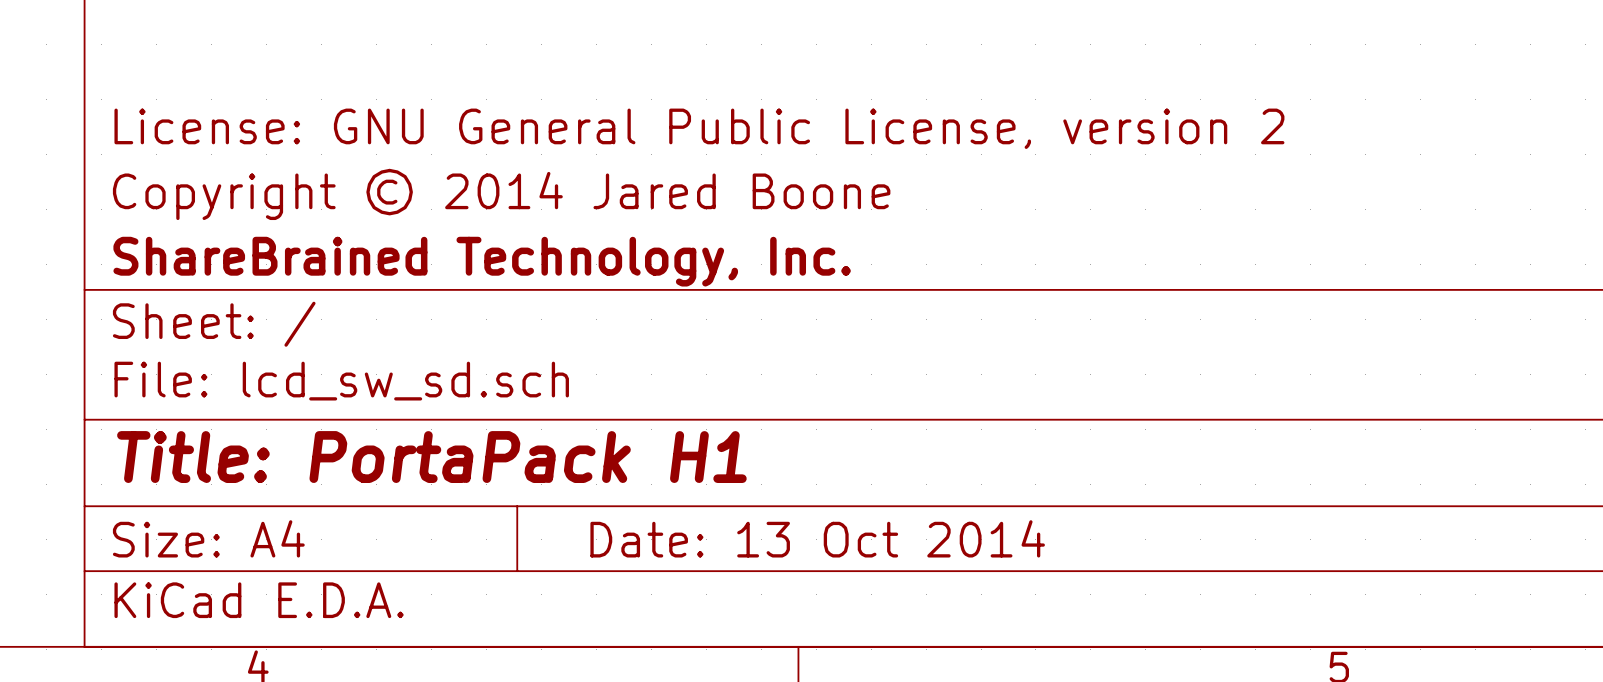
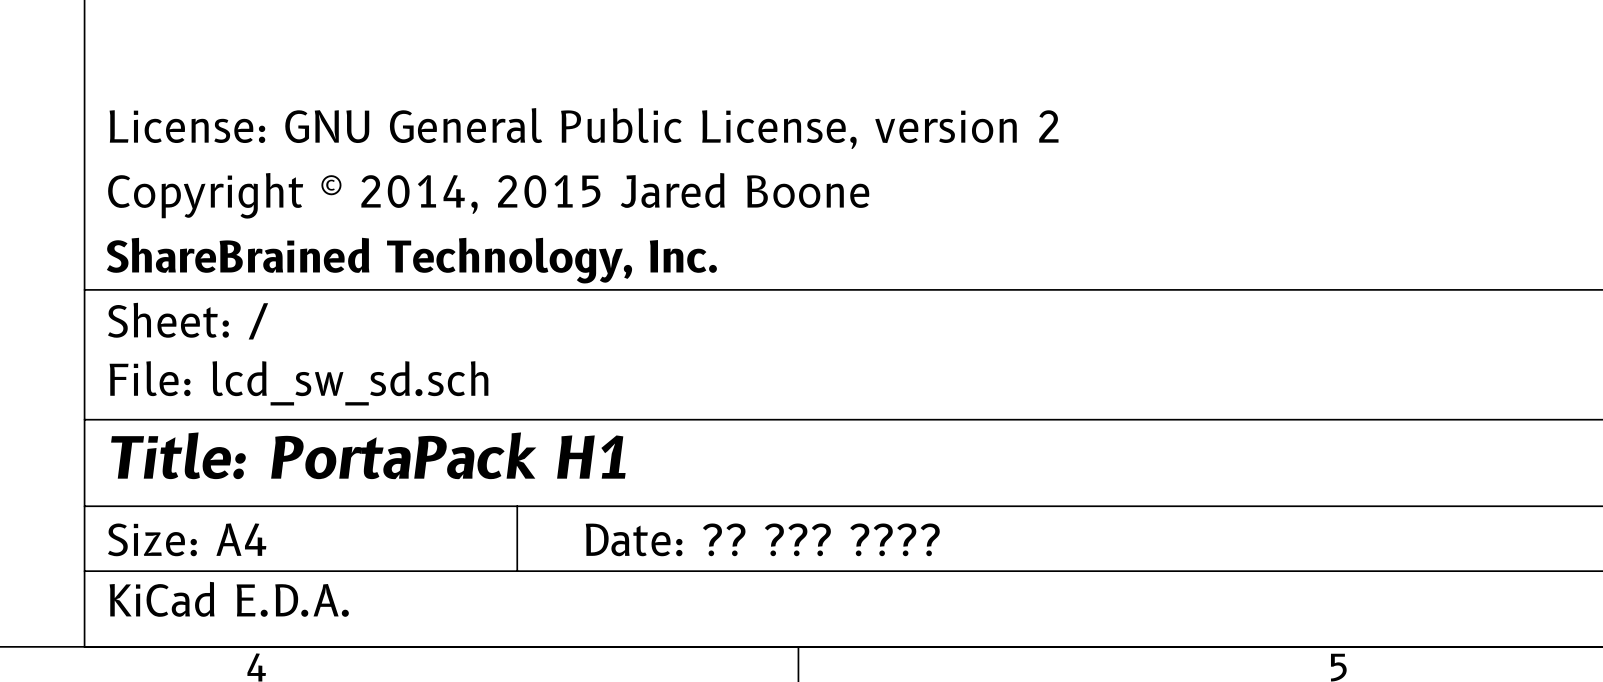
title block: Copyright © 2014 Jared Boone (501, 194) -> Copyright © 2014, 2015 Jared Boone (488, 195)
title block: Date: 13 Oct 2014 (817, 538) -> Date: ?? ??? ???? (762, 539)

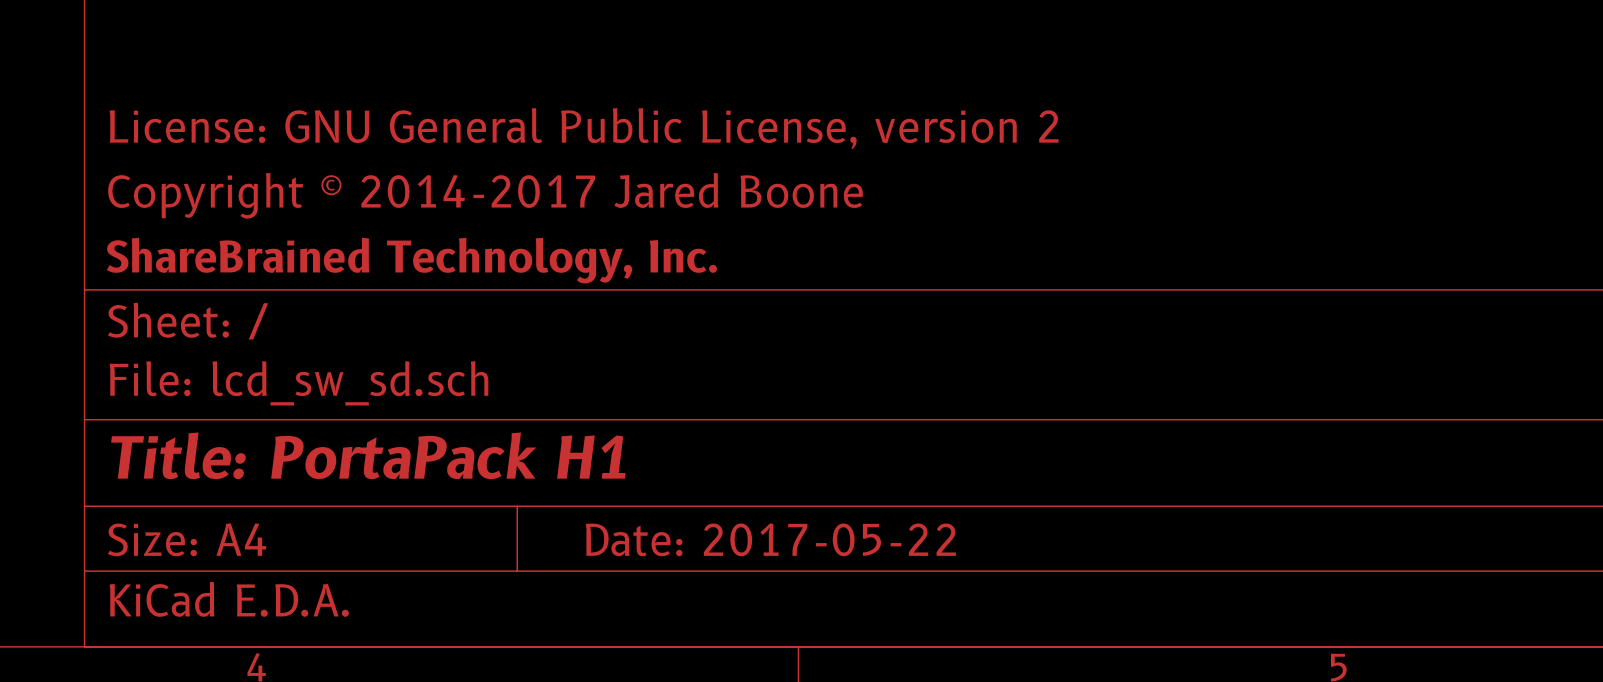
title block: Copyright © 2014, 2015 Jared Boone (488, 195) -> Copyright © 2014-2017 Jared Boone (485, 195)
title block: Date: ?? ??? ???? (762, 539) -> Date: 2017-05-22 (770, 539)

